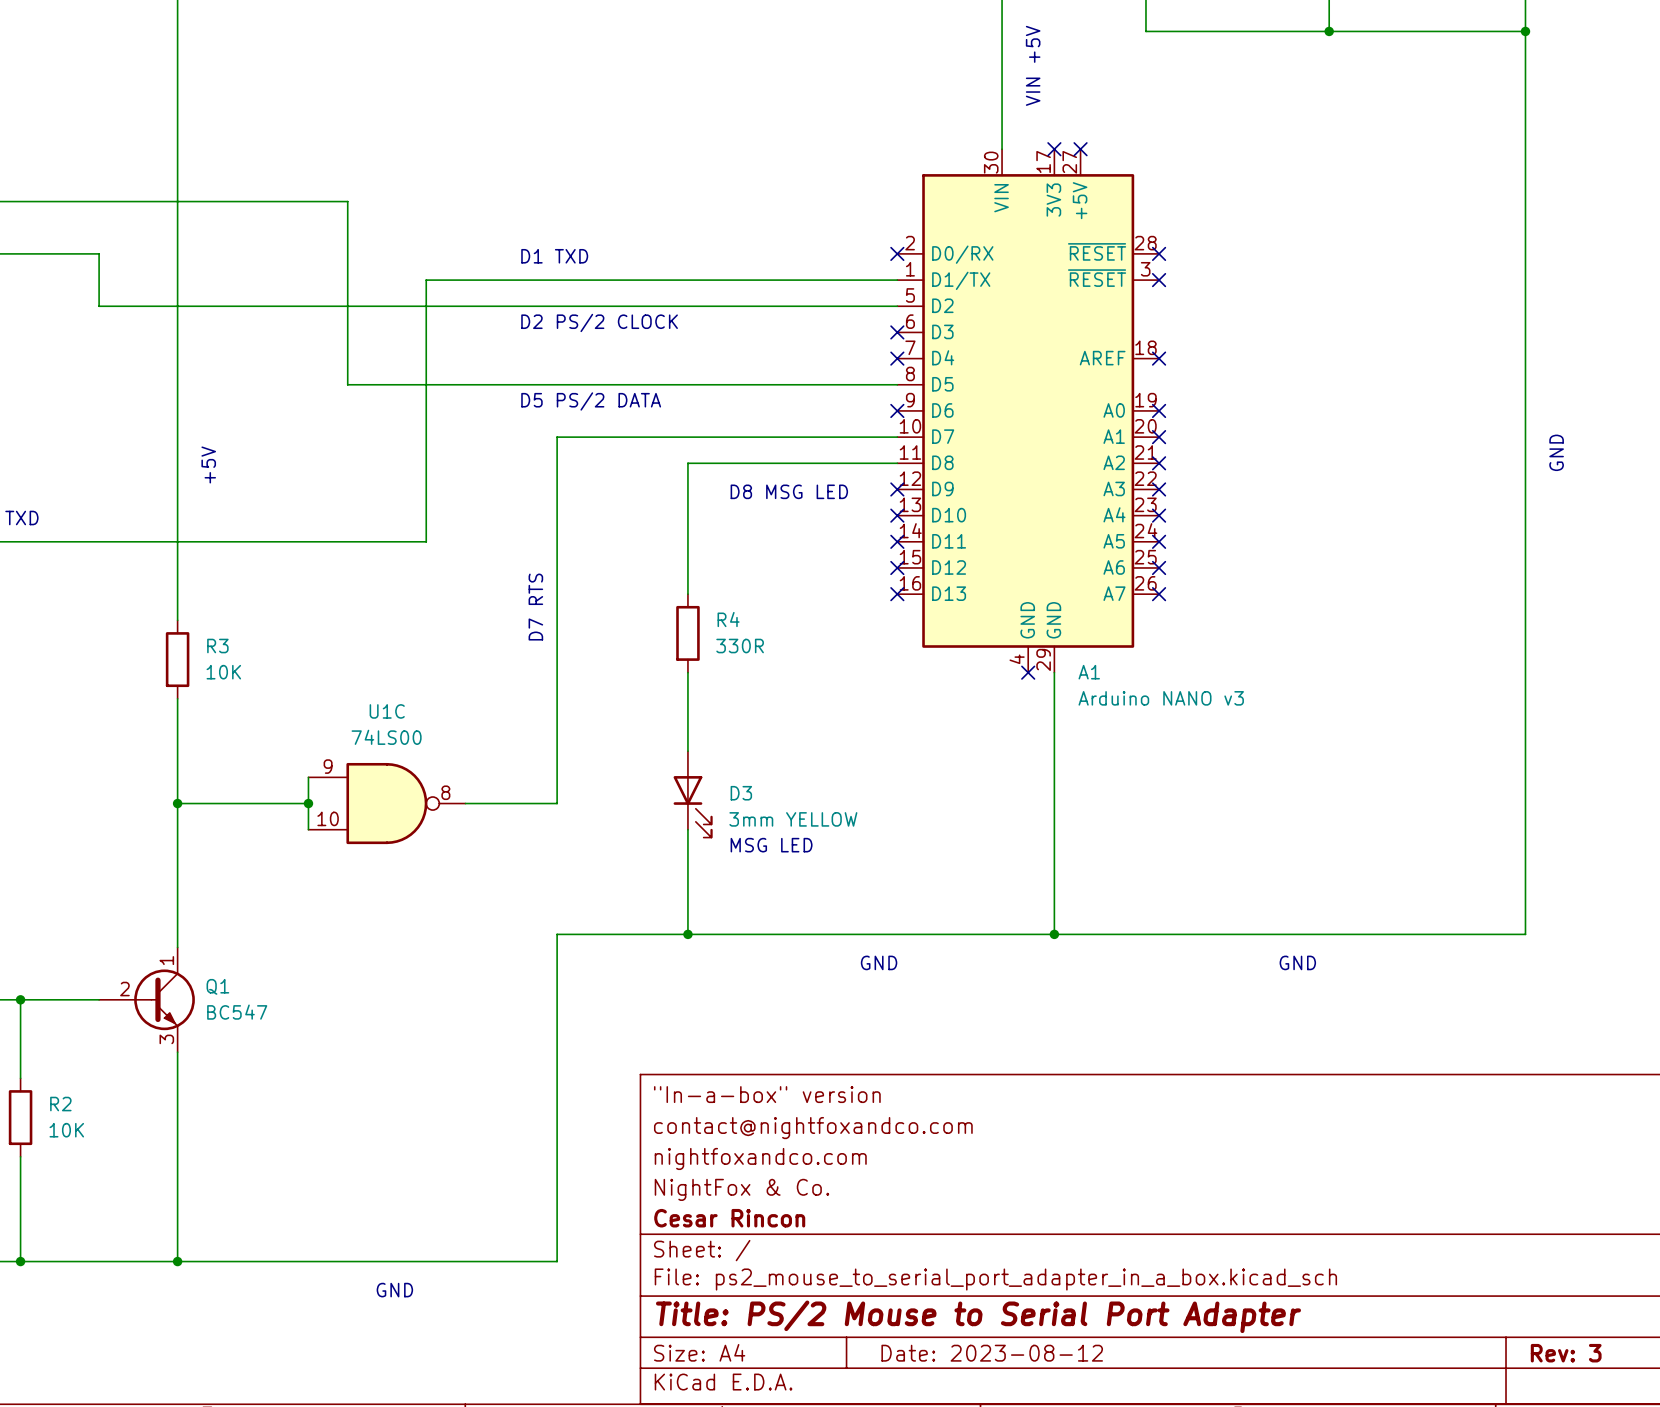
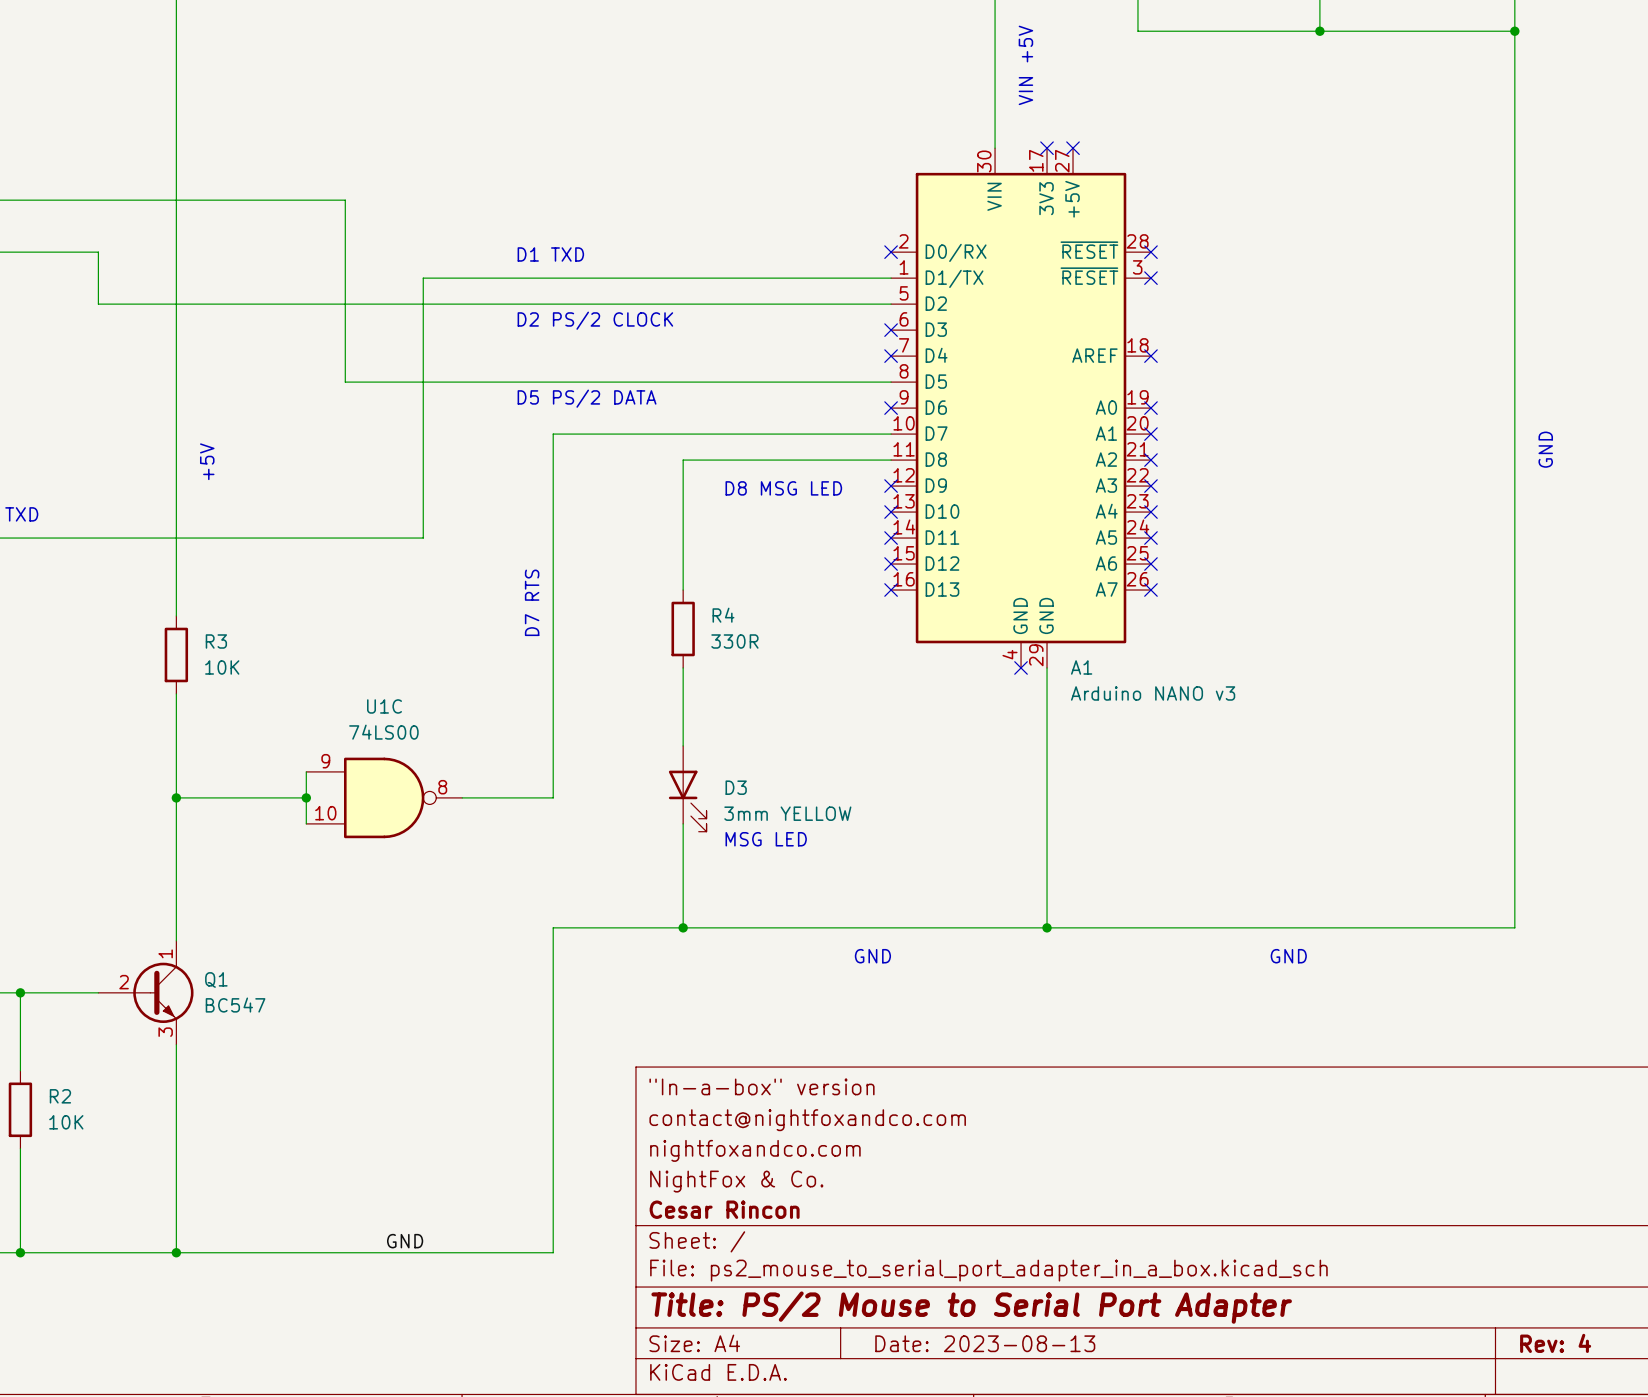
label: none -> GND (405, 1241)
text: GND (394, 1290) -> none
title block: Date: 2023-08-12 (992, 1353) -> Date: 2023-08-13 (985, 1343)
title block: Rev: 3 (1566, 1353) -> Rev: 4 (1555, 1343)

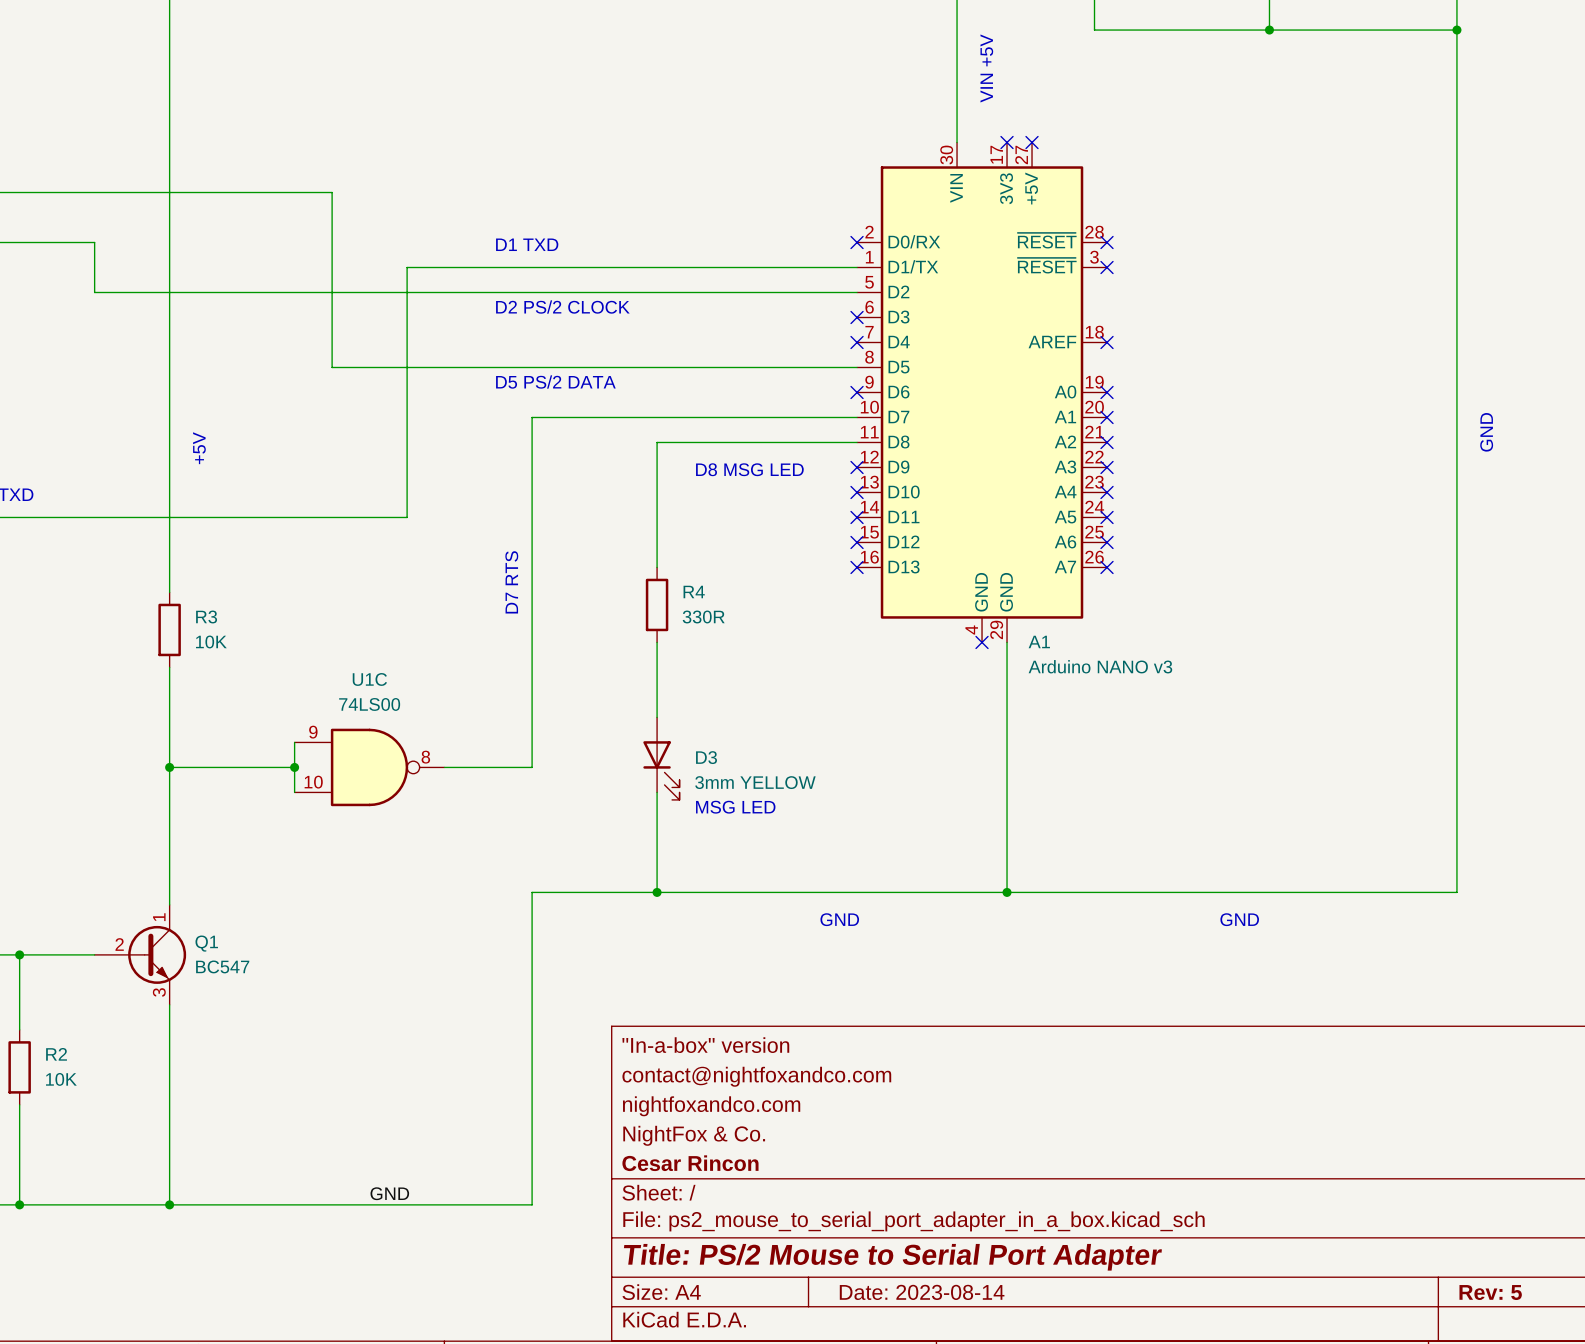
title block: Date: 2023-08-13 (985, 1343) -> Date: 2023-08-14 (922, 1292)
title block: Rev: 4 (1555, 1343) -> Rev: 5 (1490, 1292)

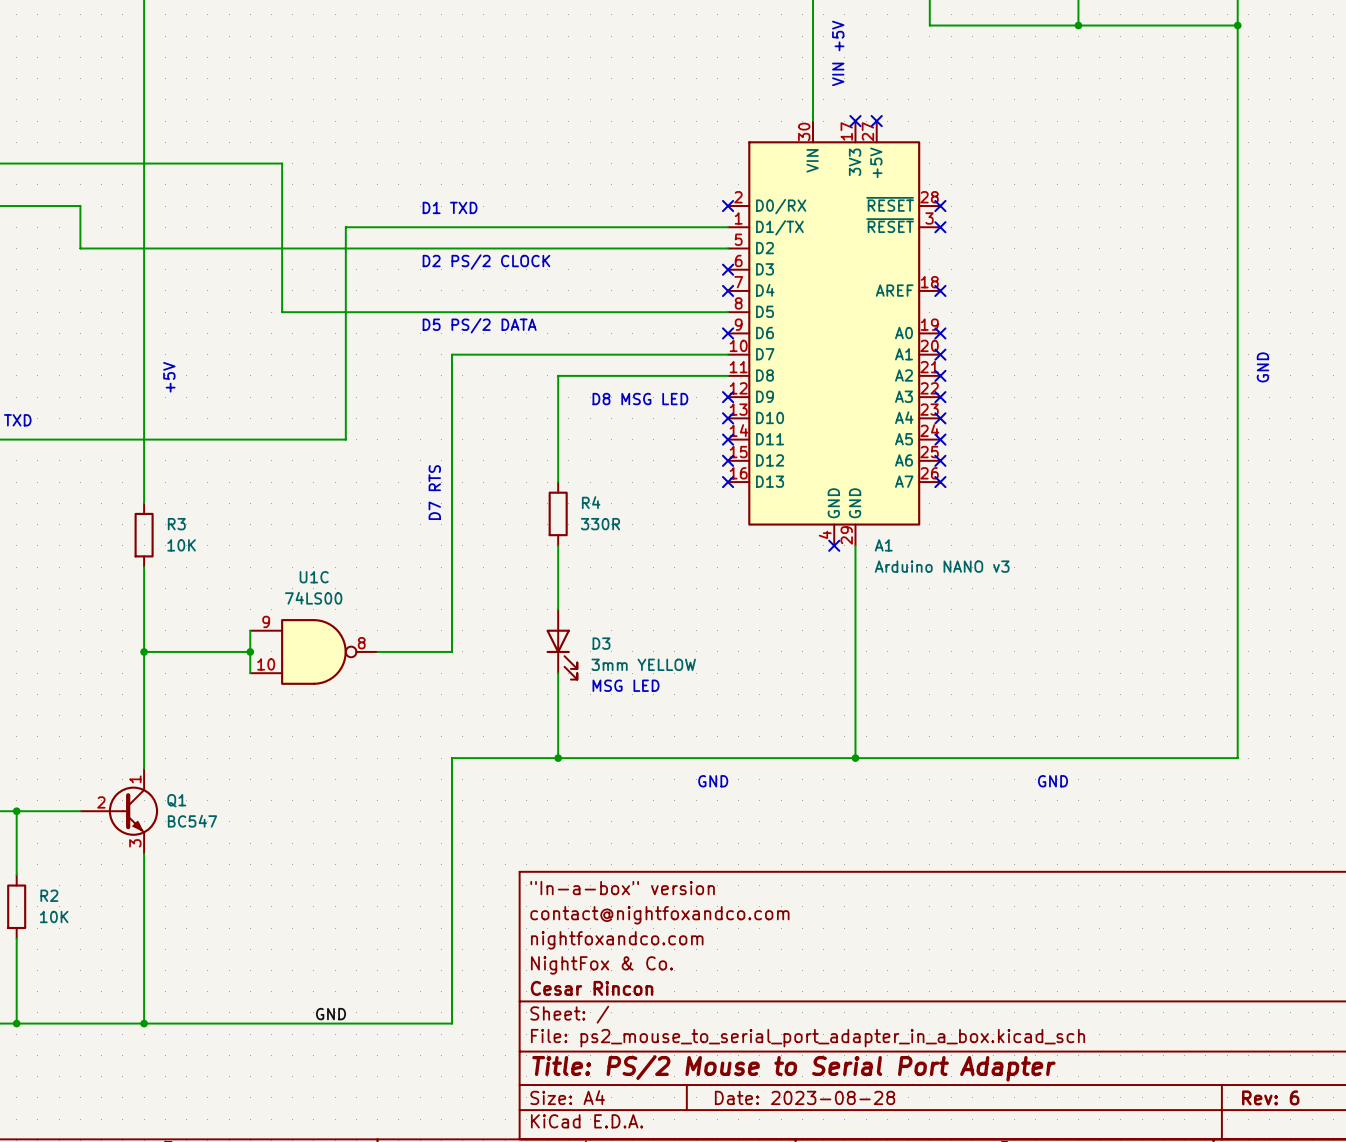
title block: Date: 2023-08-14 (922, 1292) -> Date: 2023-08-28 (805, 1097)
title block: Rev: 5 (1490, 1292) -> Rev: 6 (1270, 1097)

